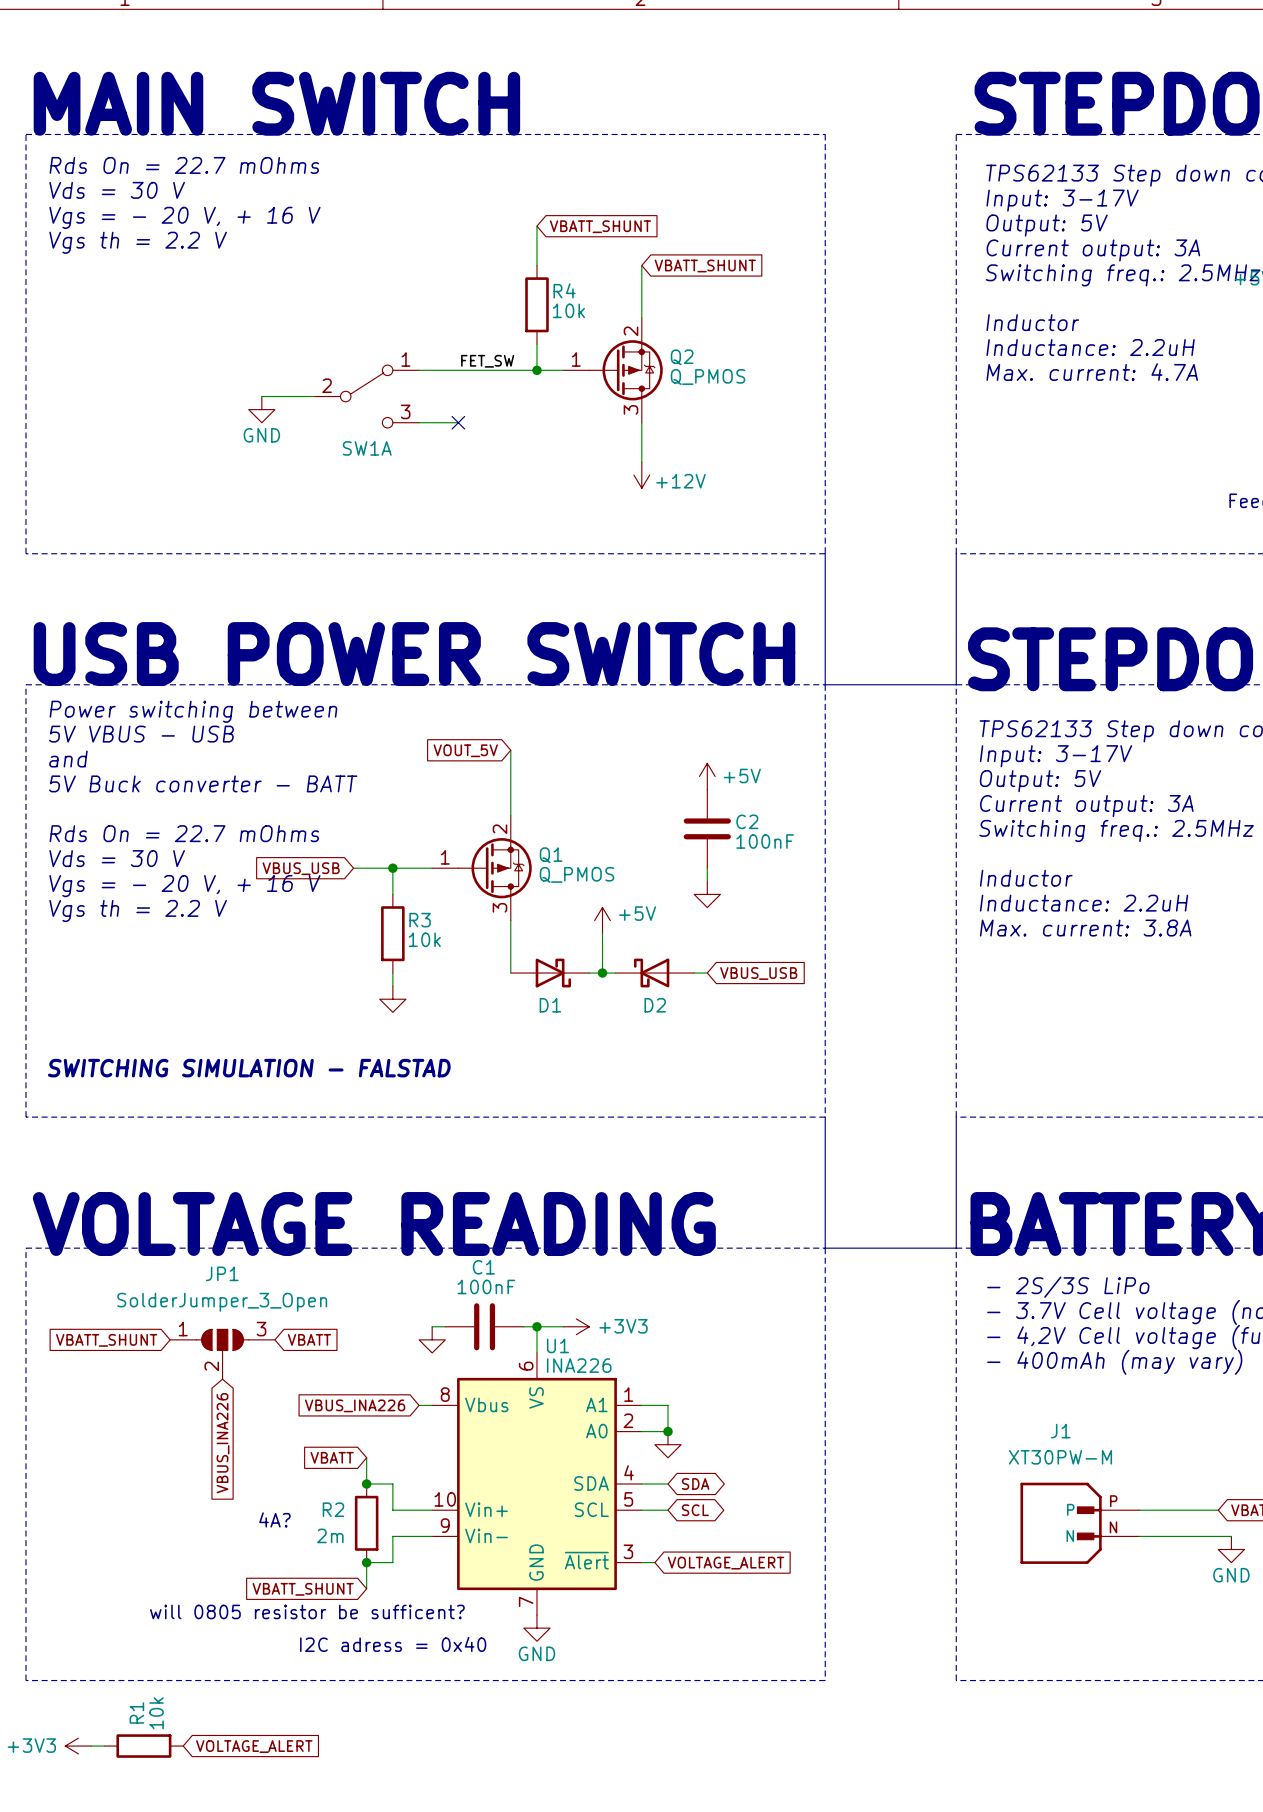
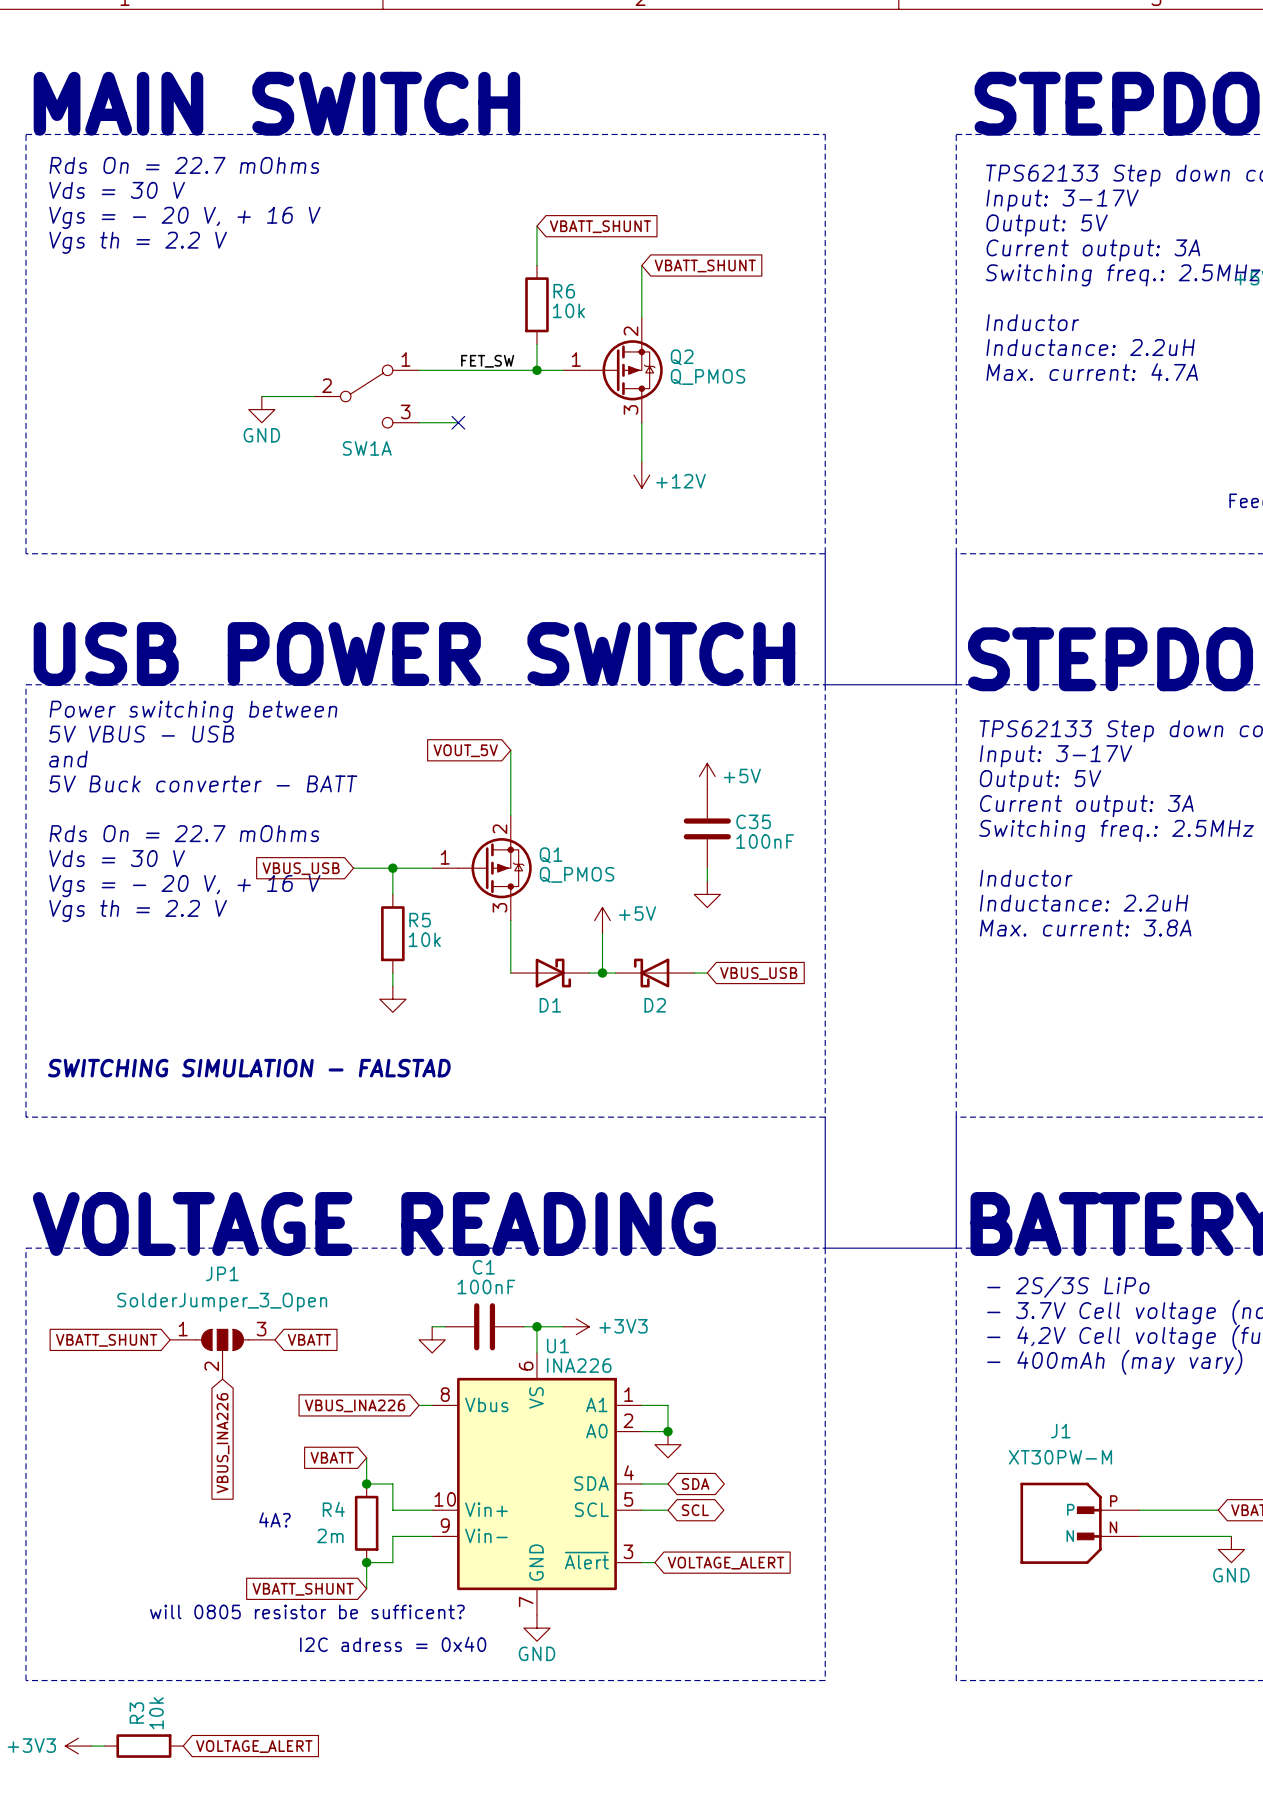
R4 name: R4 (564, 290) -> R6 (564, 291)
C2 name: C2 (747, 821) -> C35 (753, 821)
R3 name: R3 (420, 920) -> R5 (420, 920)
R2 name: R2 (333, 1509) -> R4 (333, 1509)
R1 name: R1 (136, 1712) -> R3 (136, 1712)

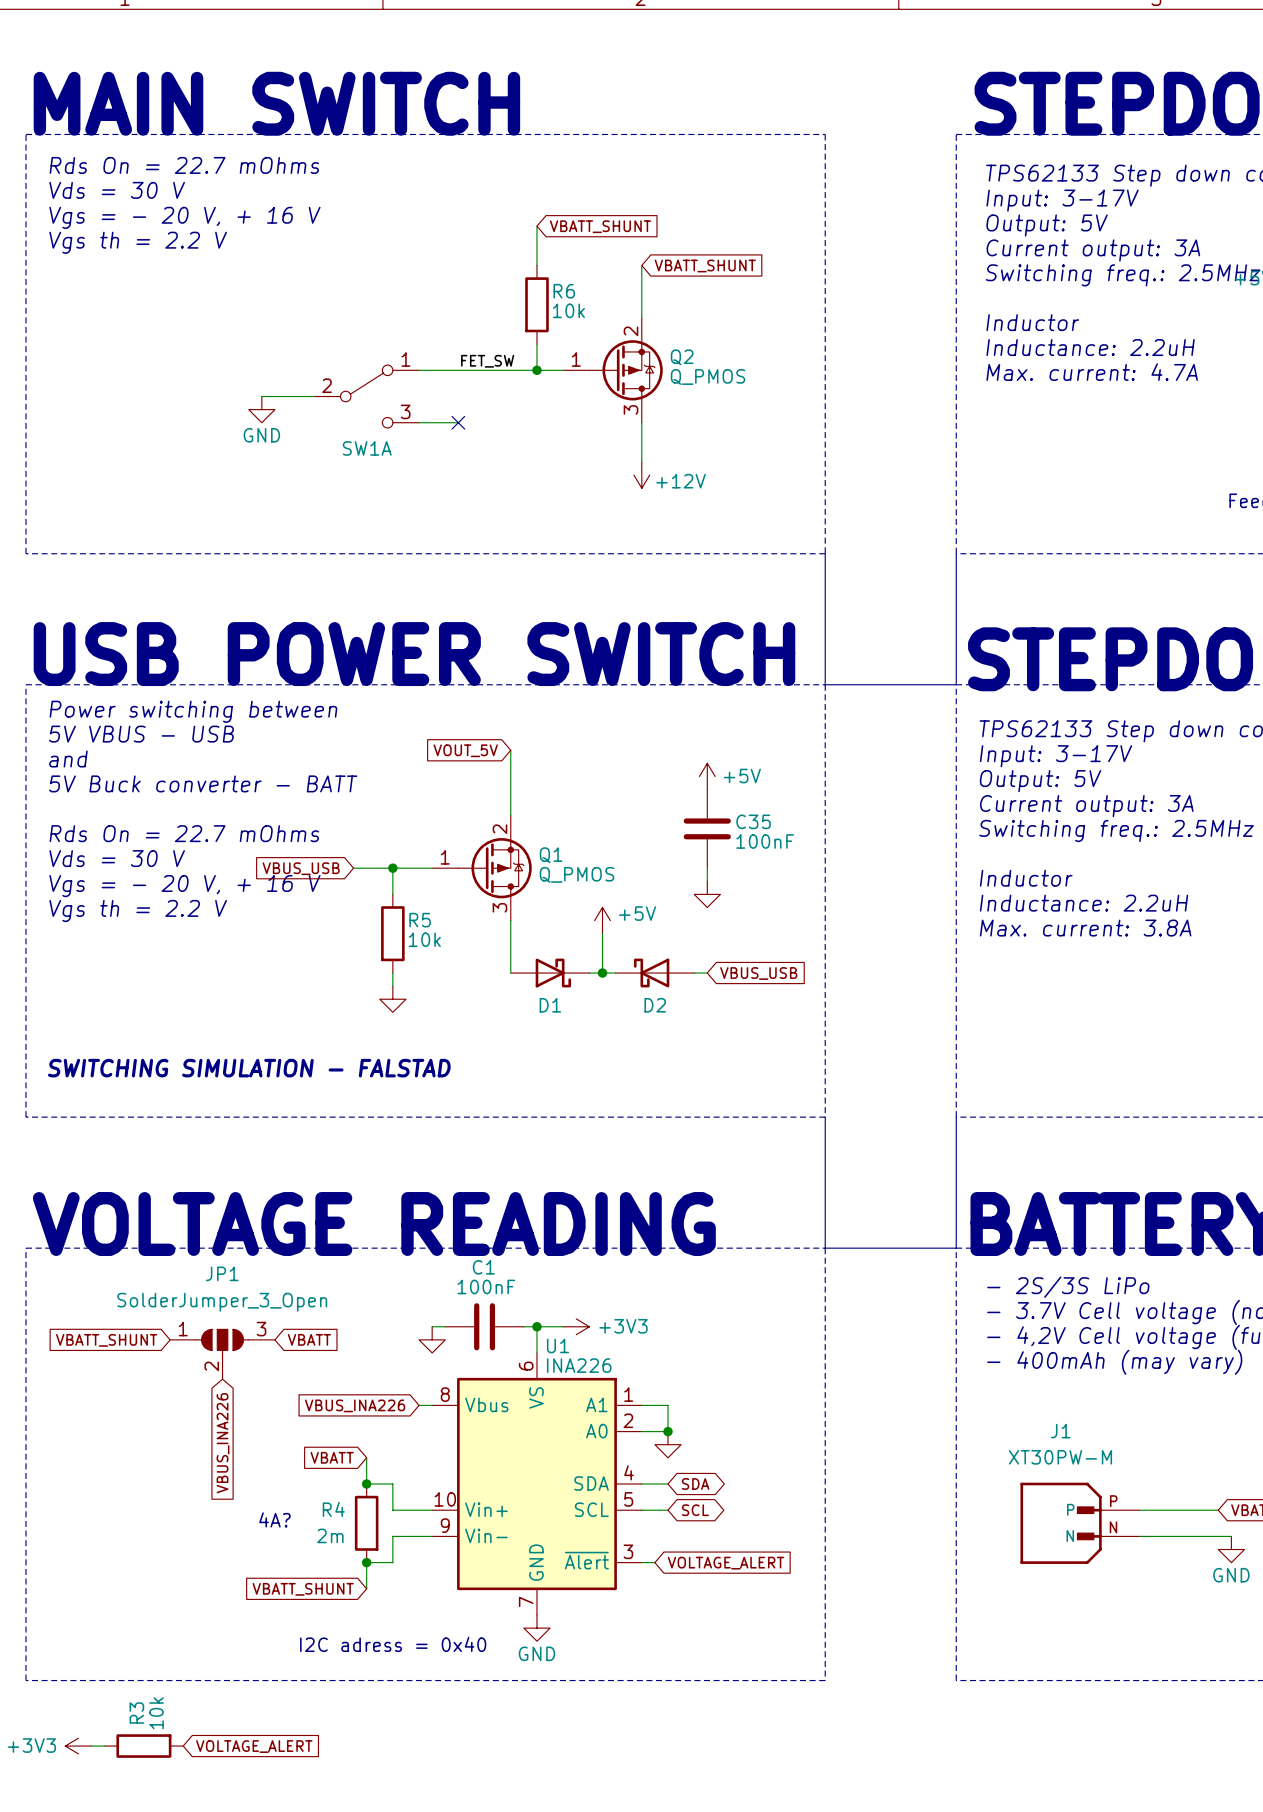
text: will 0805 resistor be sufficent? (307, 1611) -> none

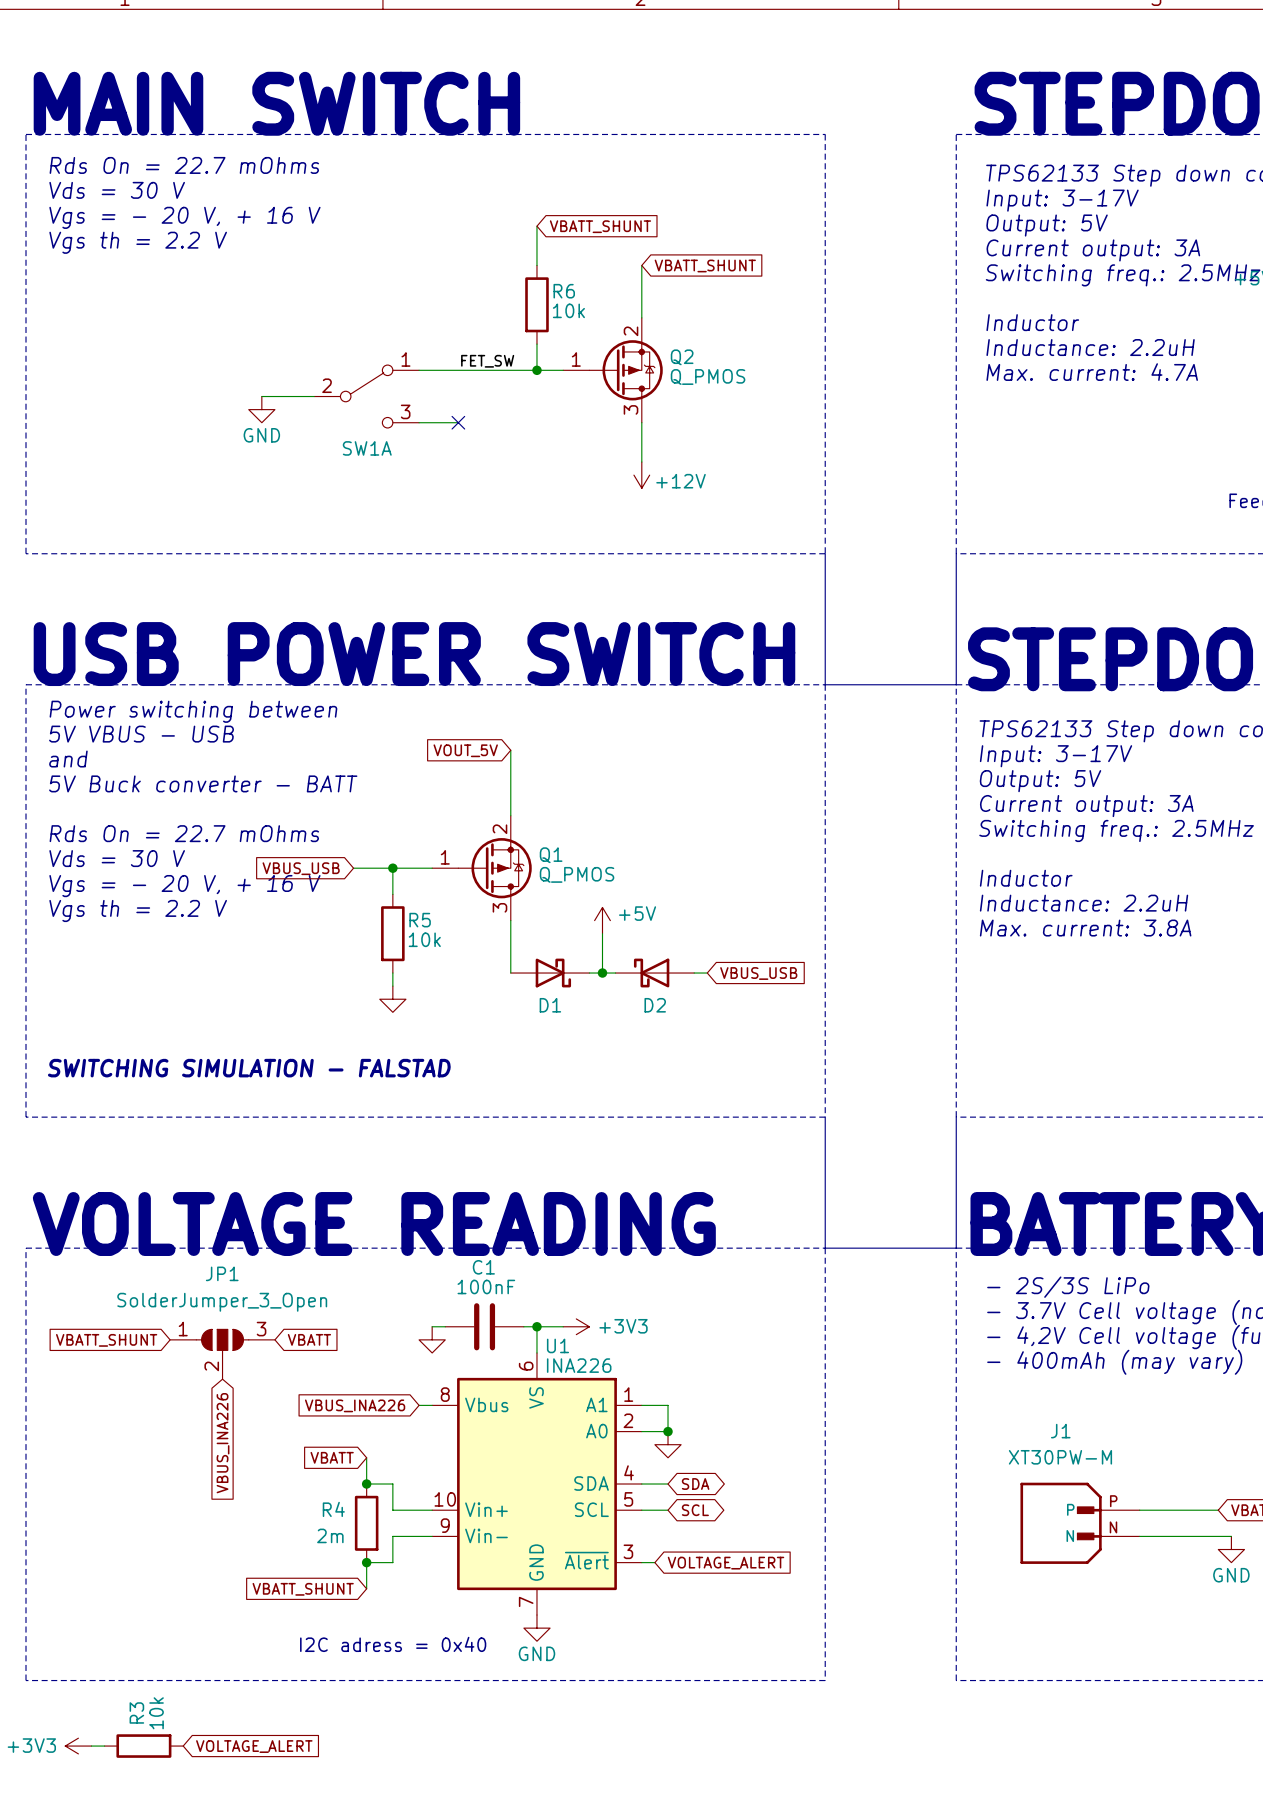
power symbol: +5V (707, 776) -> none
C35: 100nF (707, 828) -> none
wire: (707, 868) (707, 881) -> none
power symbol: (707, 894) -> none
text: 4A? (274, 1519) -> none

